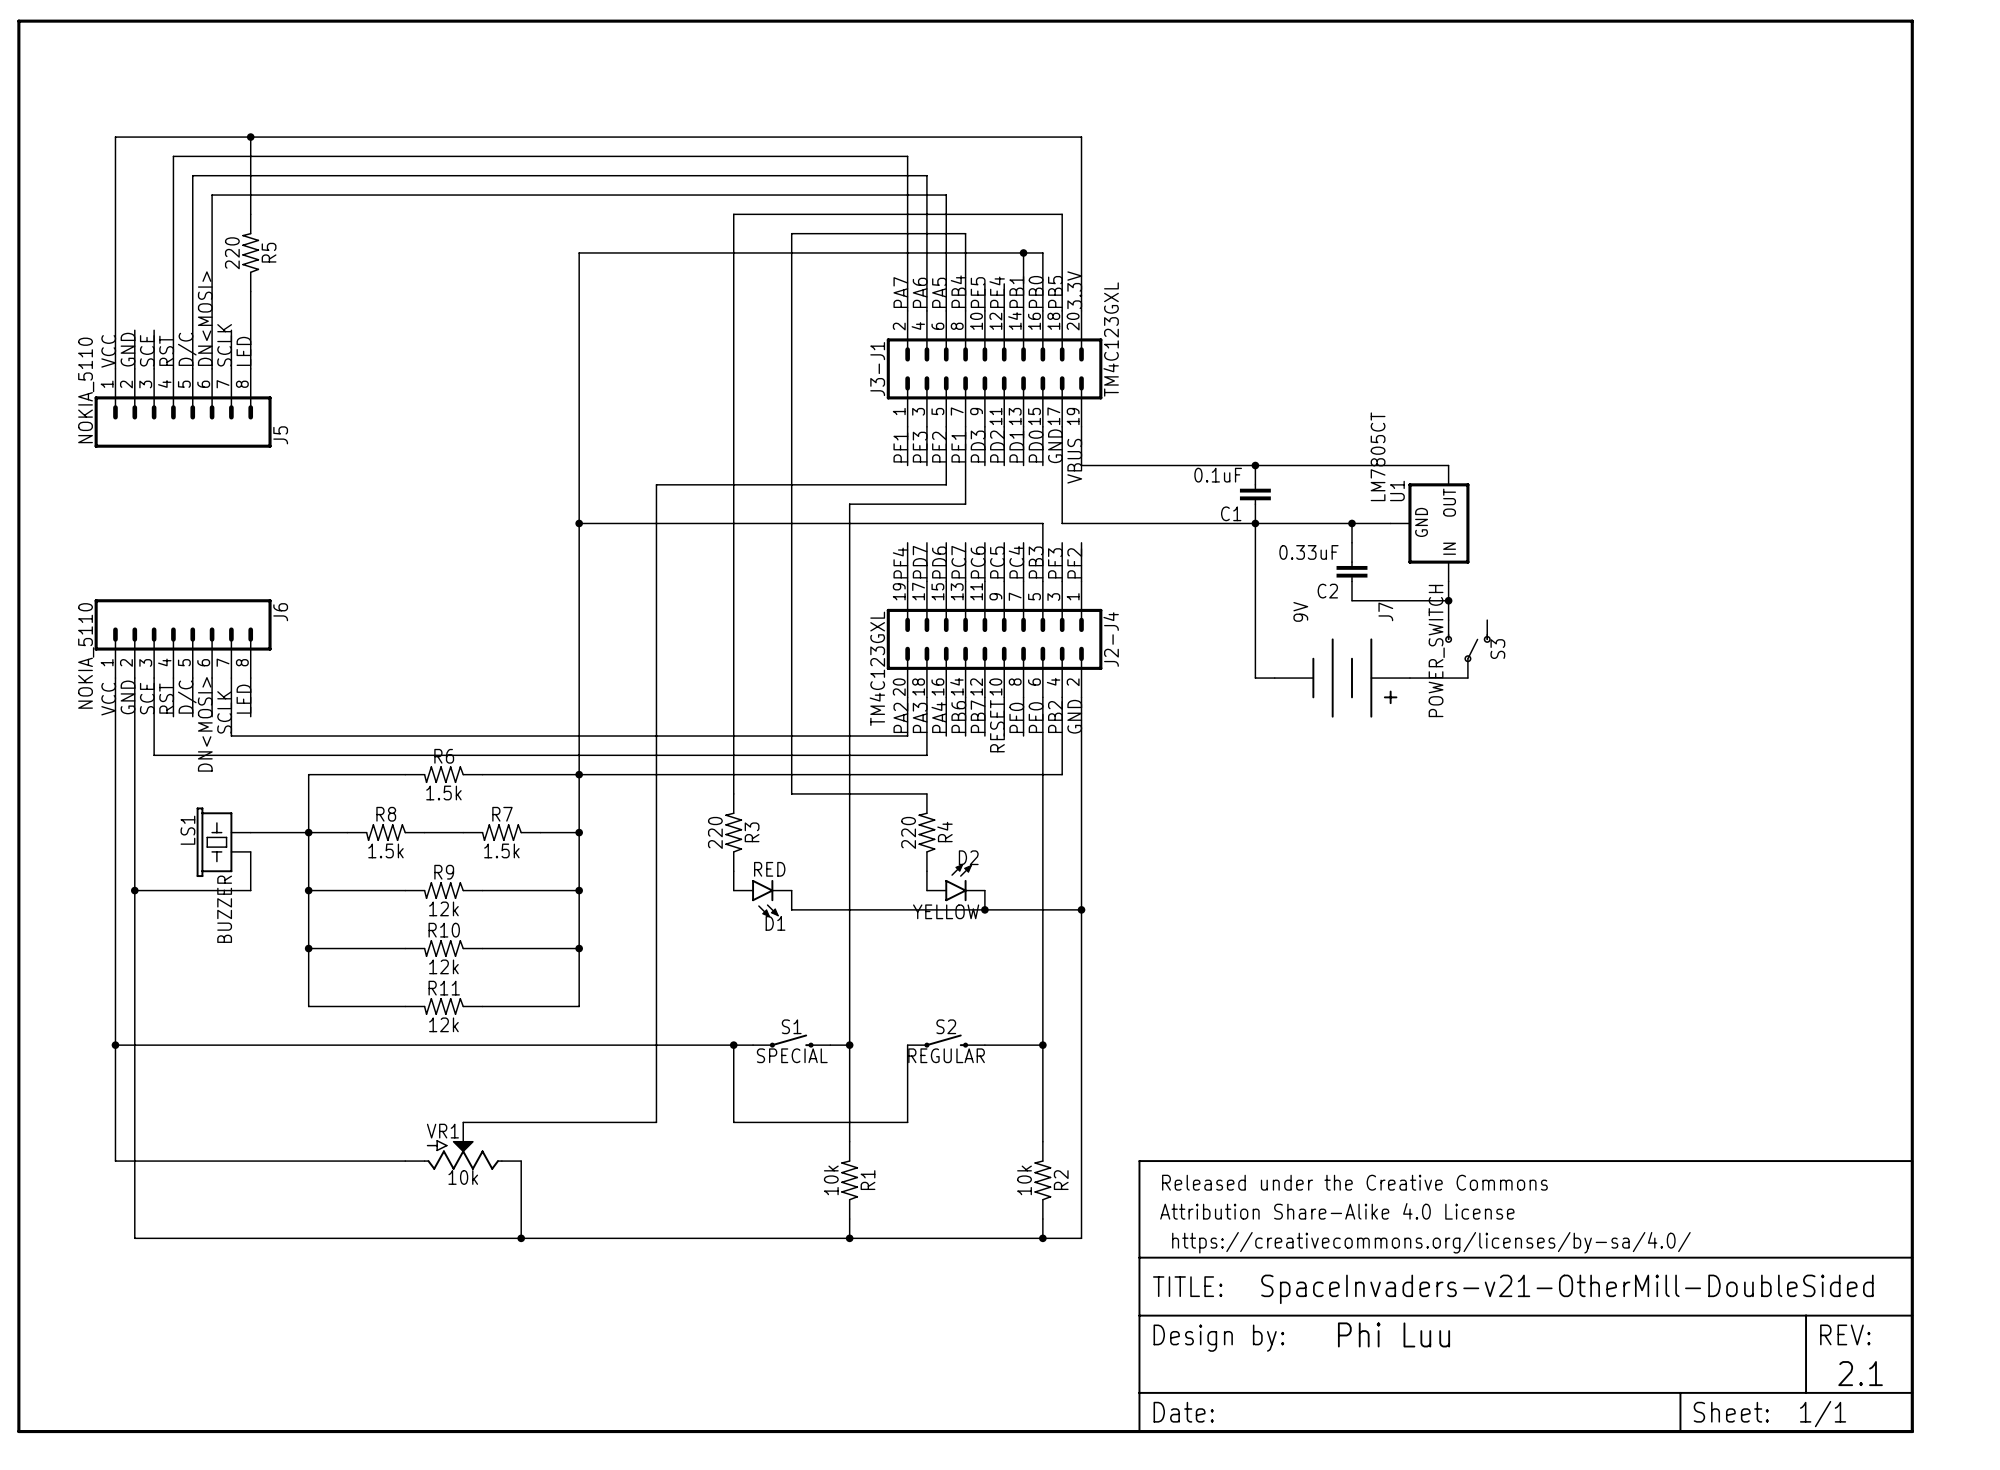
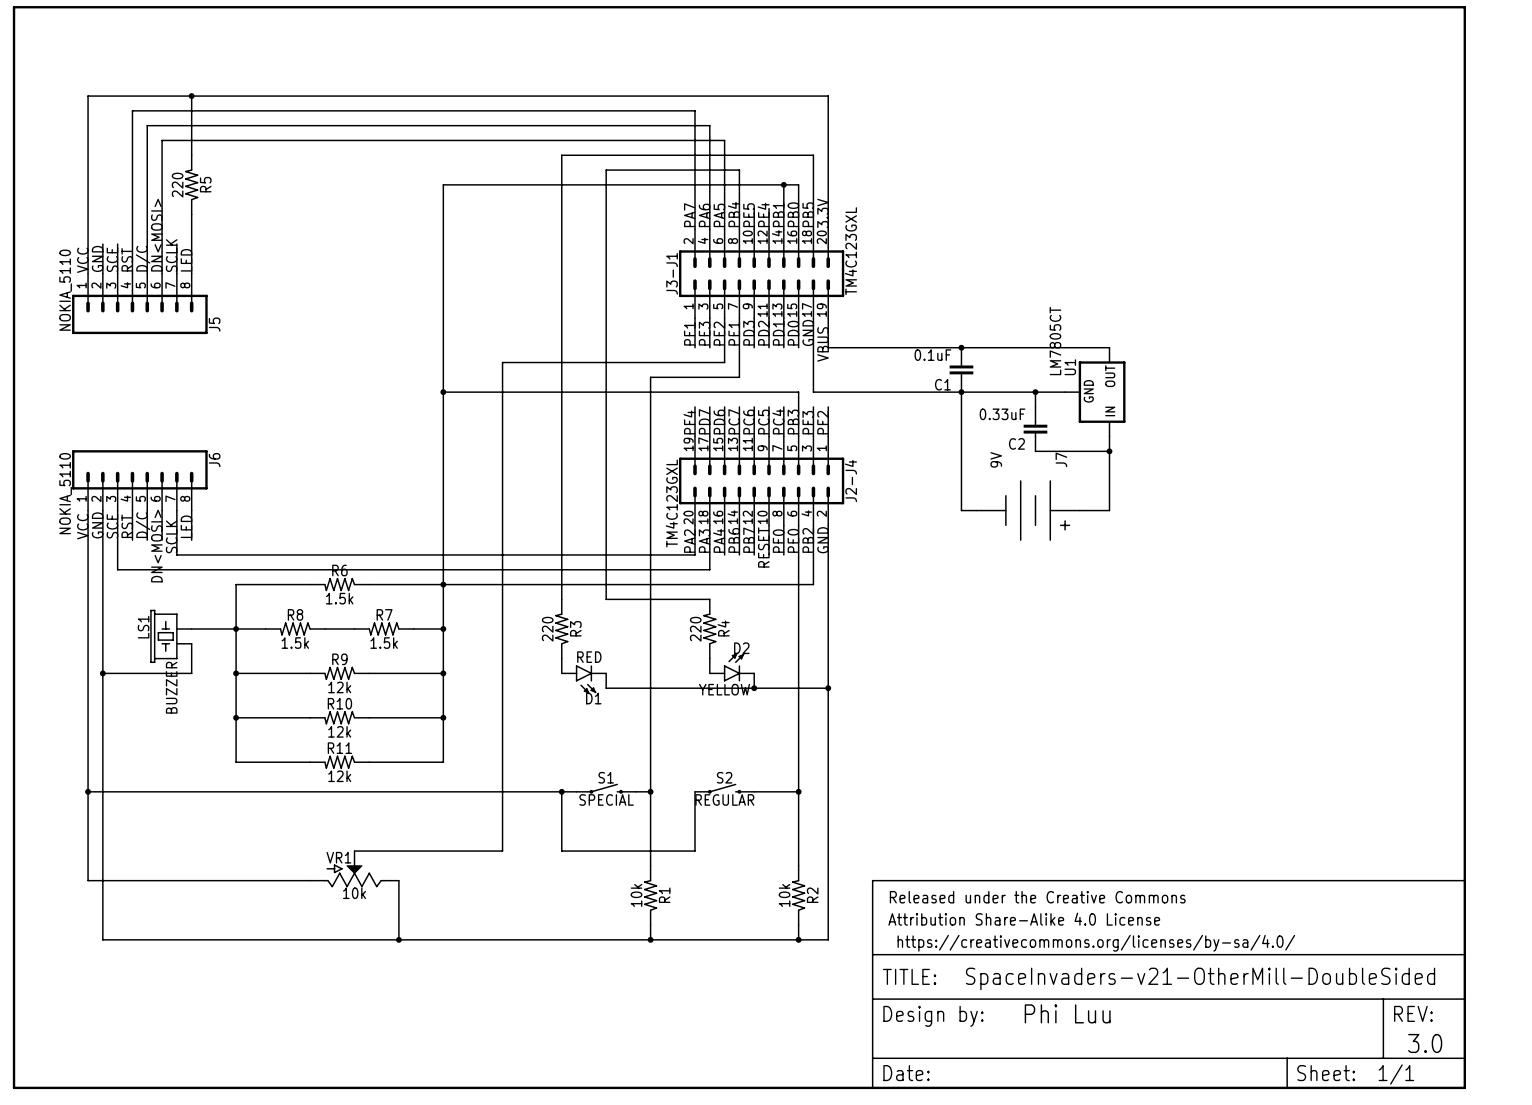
S3: POWER_SWITCH (1467, 649) -> none
wire: (1448, 678) (1467, 678) -> (1109, 510) (1109, 466)
text: 2.1 (1860, 1373) -> 3.0 (1425, 1043)

